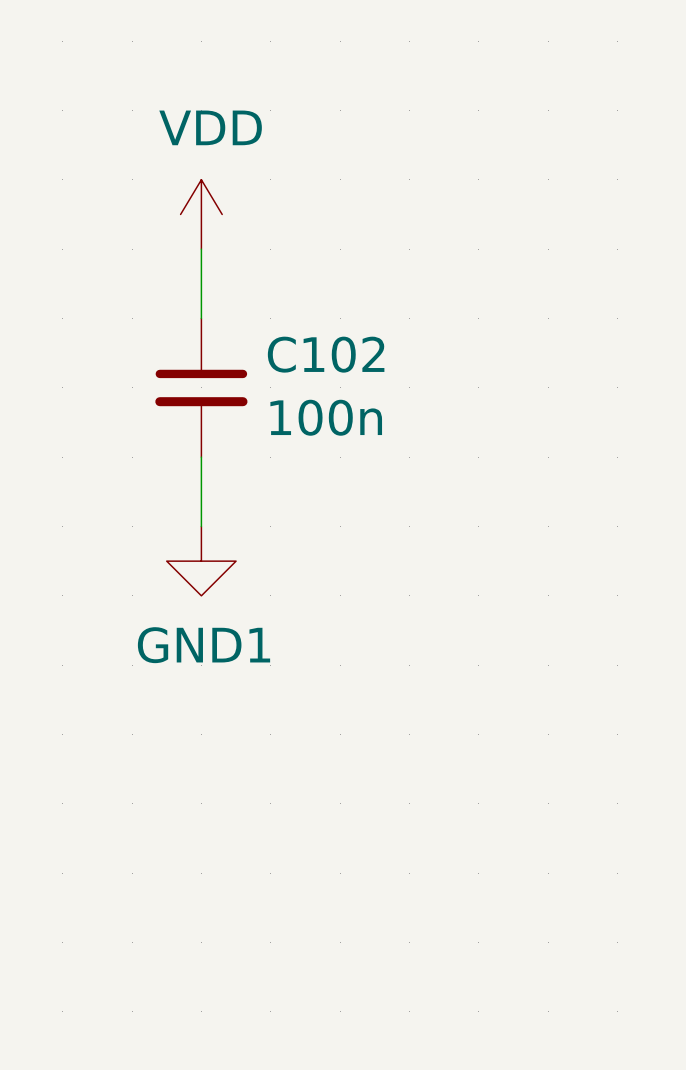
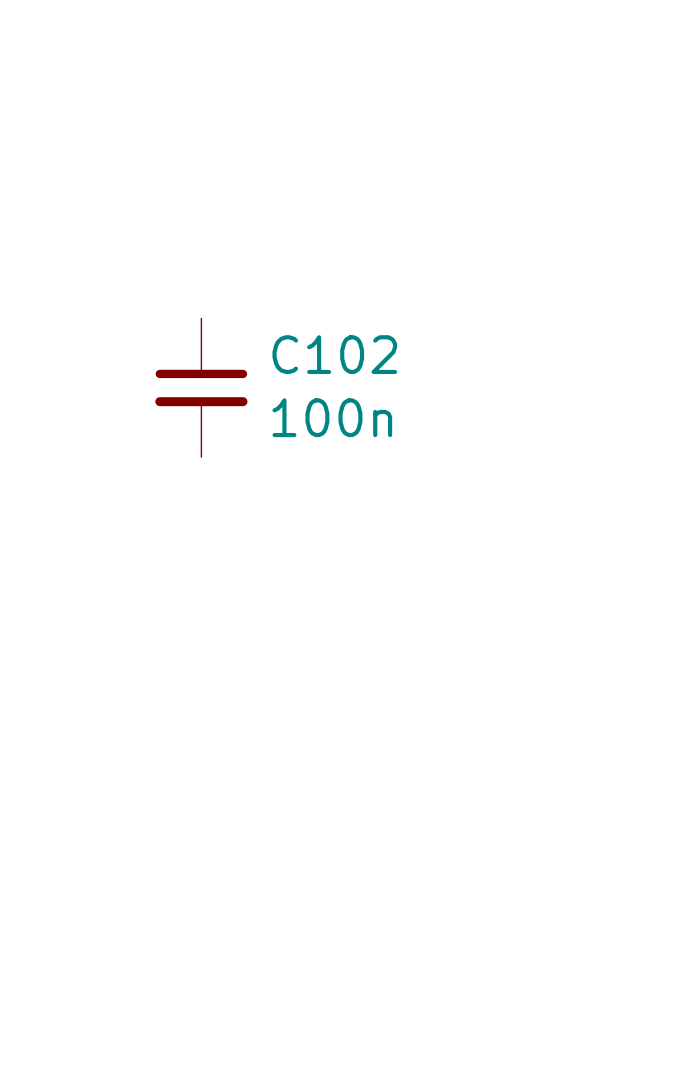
power symbol: VDD (201, 214) -> none
wire: (201, 249) (201, 318) -> none
wire: (201, 457) (201, 526) -> none
power symbol: GND1 (201, 561) -> none

